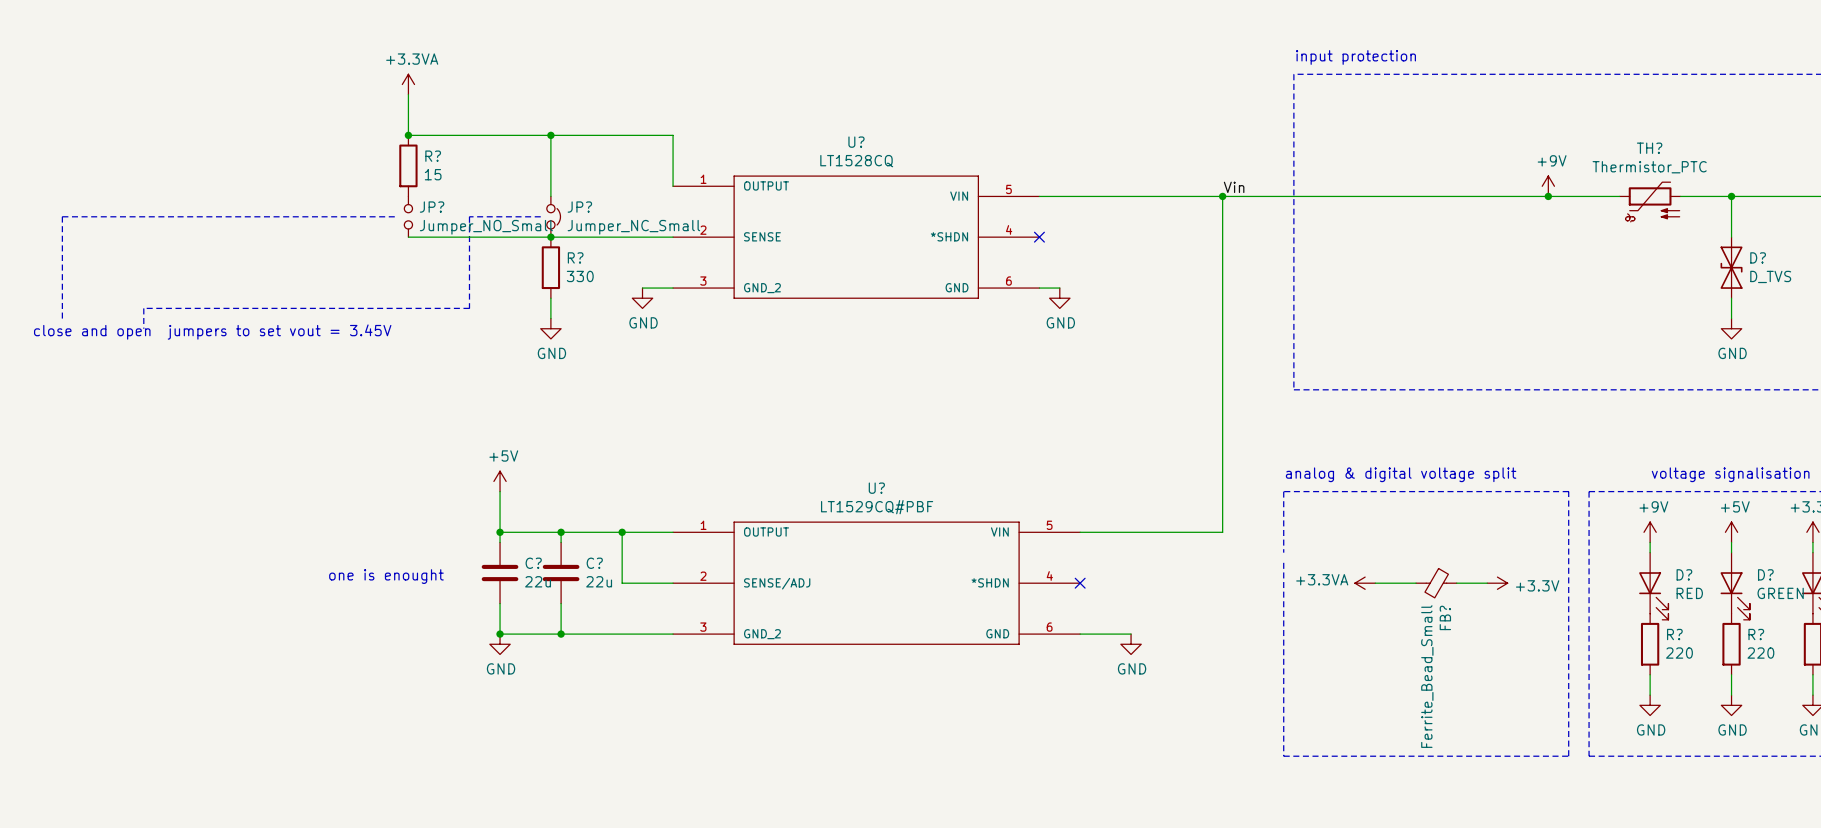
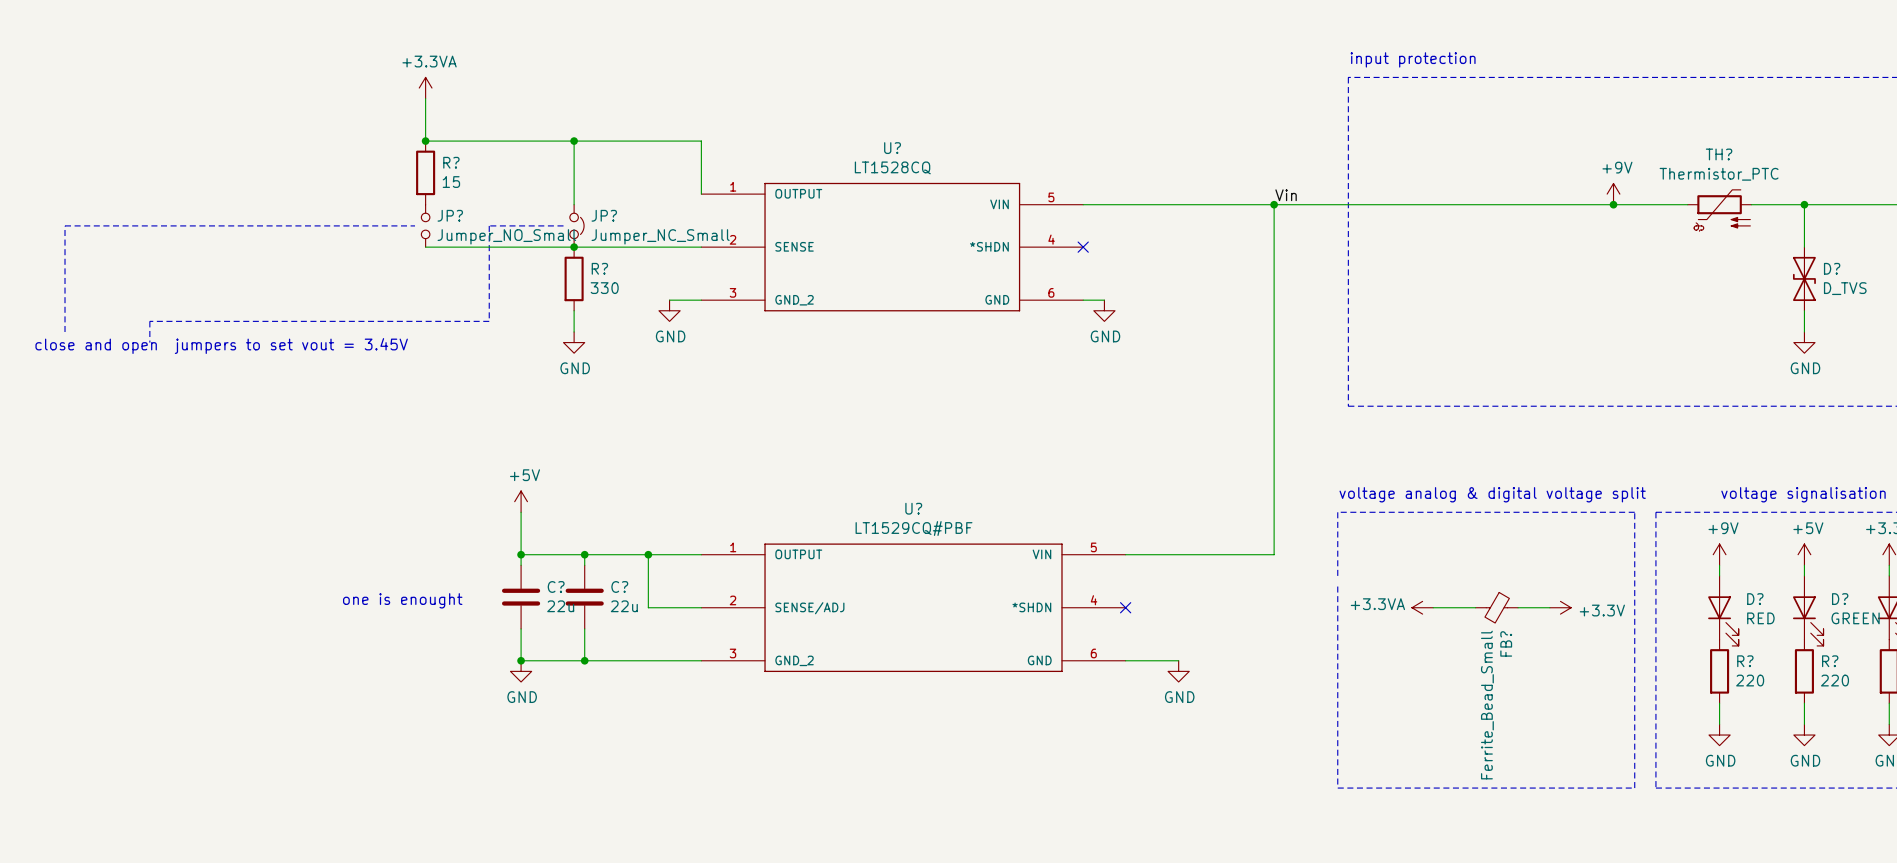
text: analog & digital voltage split (1401, 474) -> voltage analog & digital voltage split (1492, 494)

